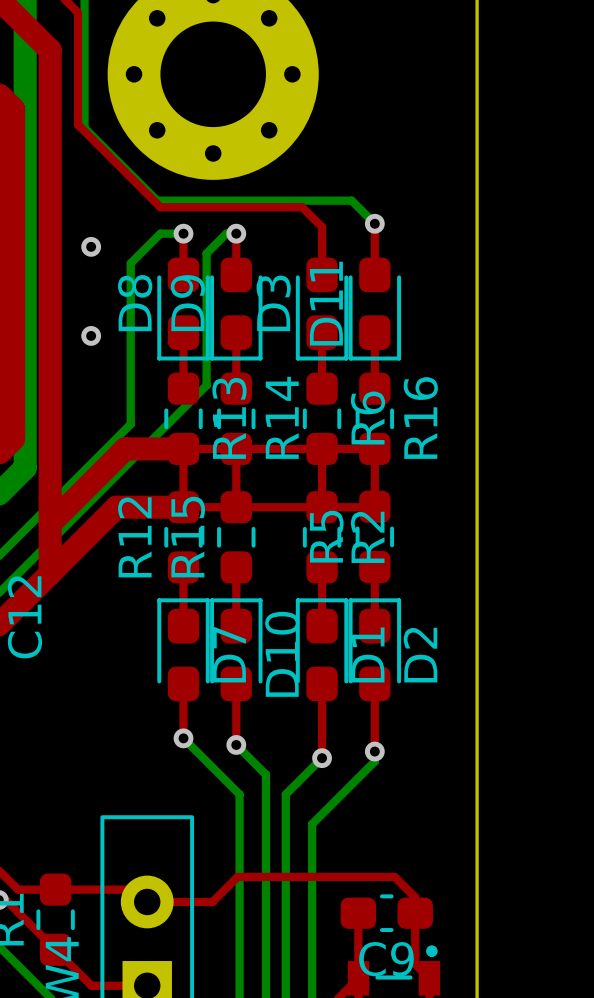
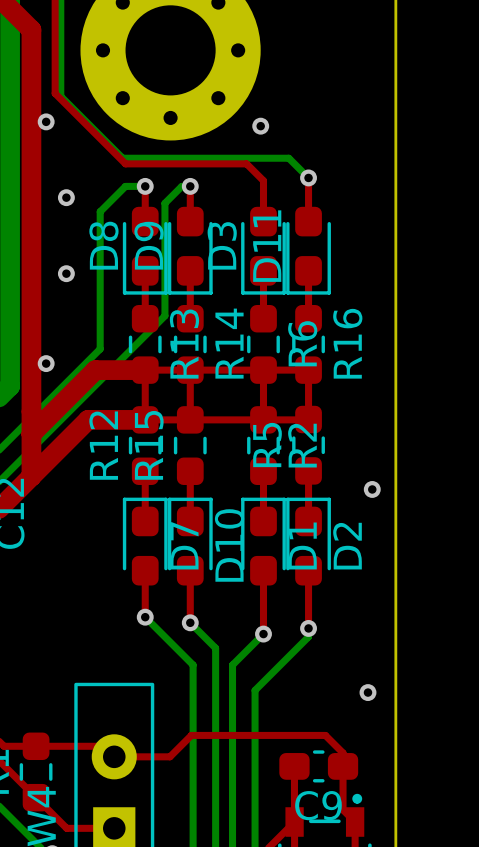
via: none -> (46, 121)
via: none -> (260, 126)
via: none -> (46, 363)
via: none -> (372, 489)
via: none -> (367, 692)

